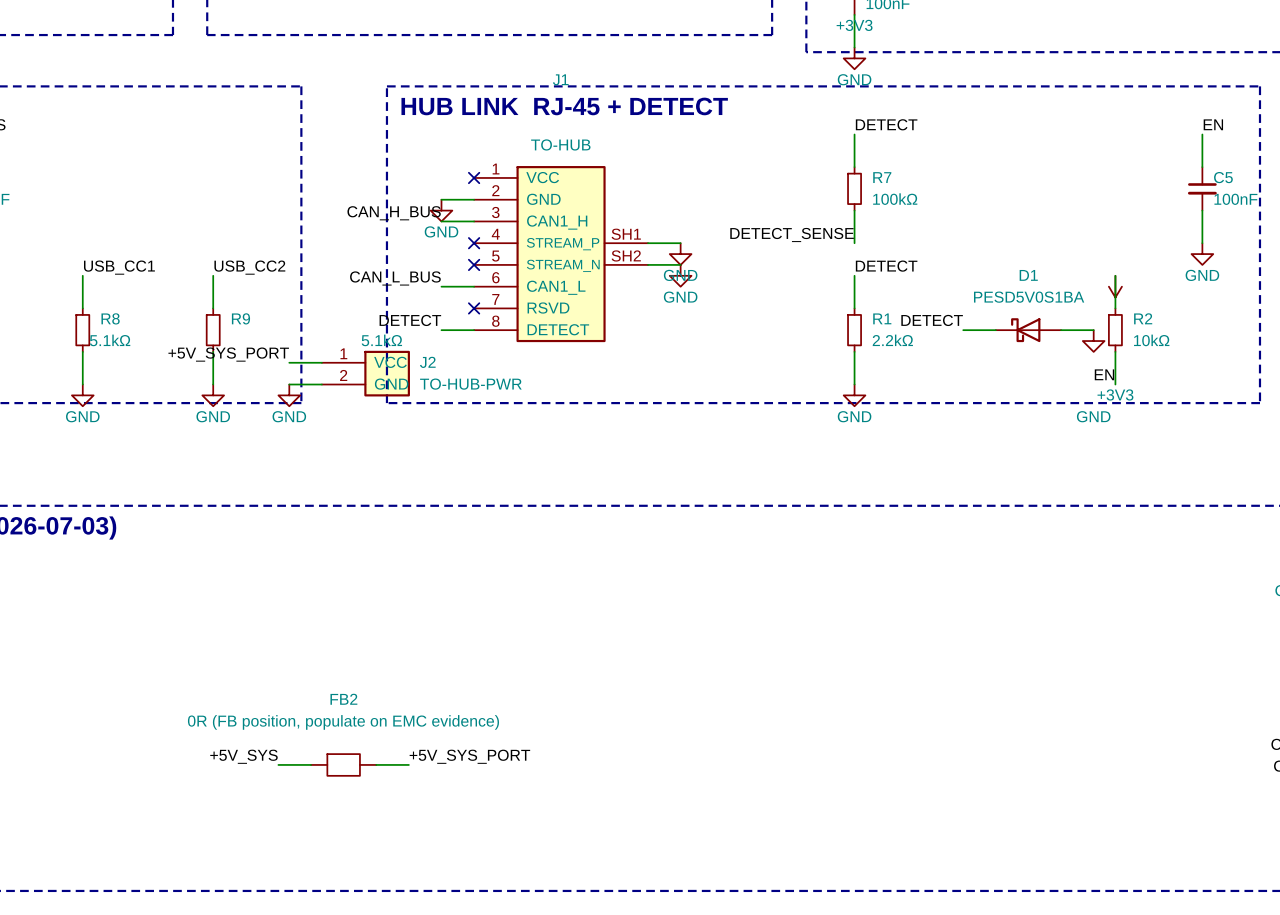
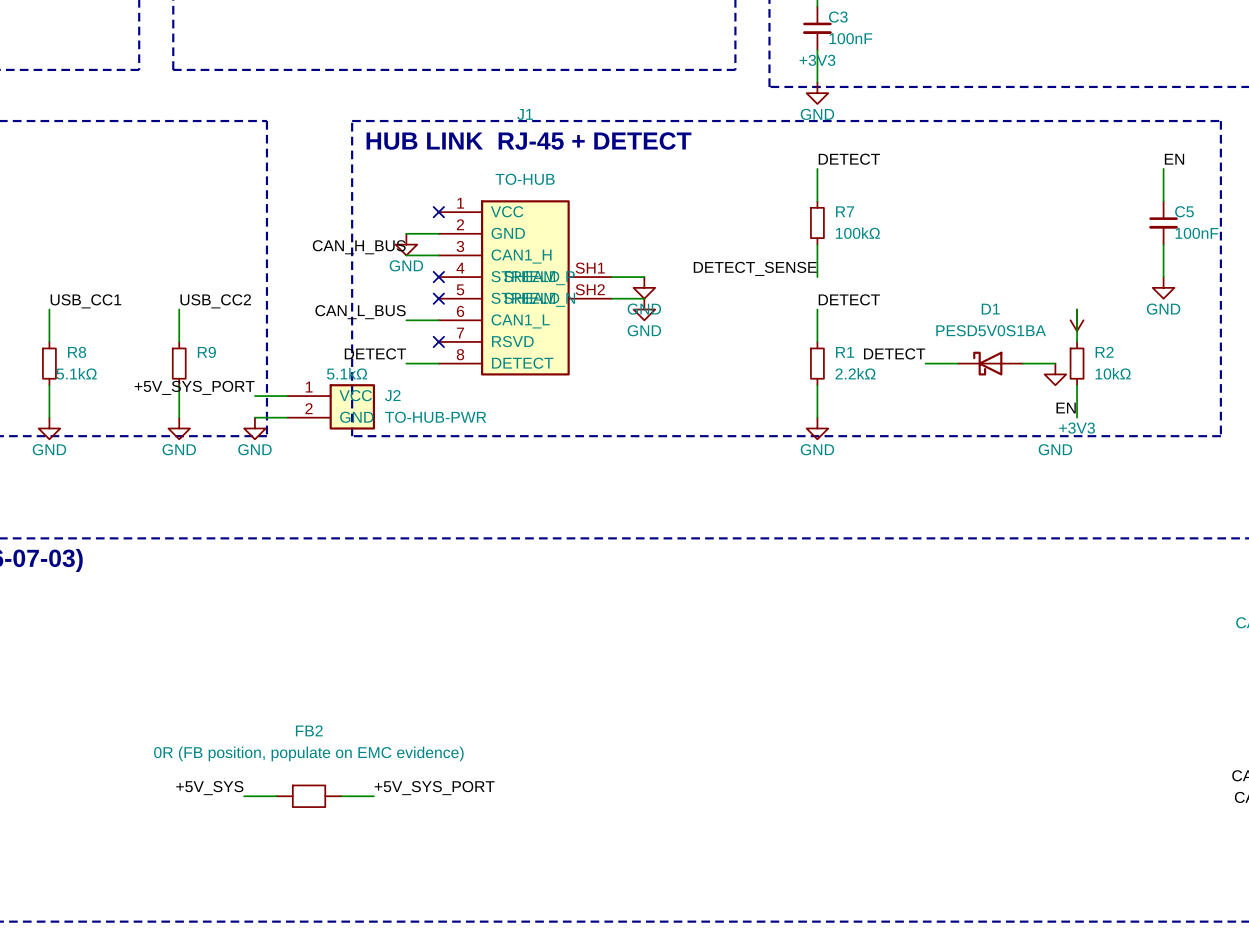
J1 symbol: [474, 166, 649, 343] -> [438, 200, 612, 376]

